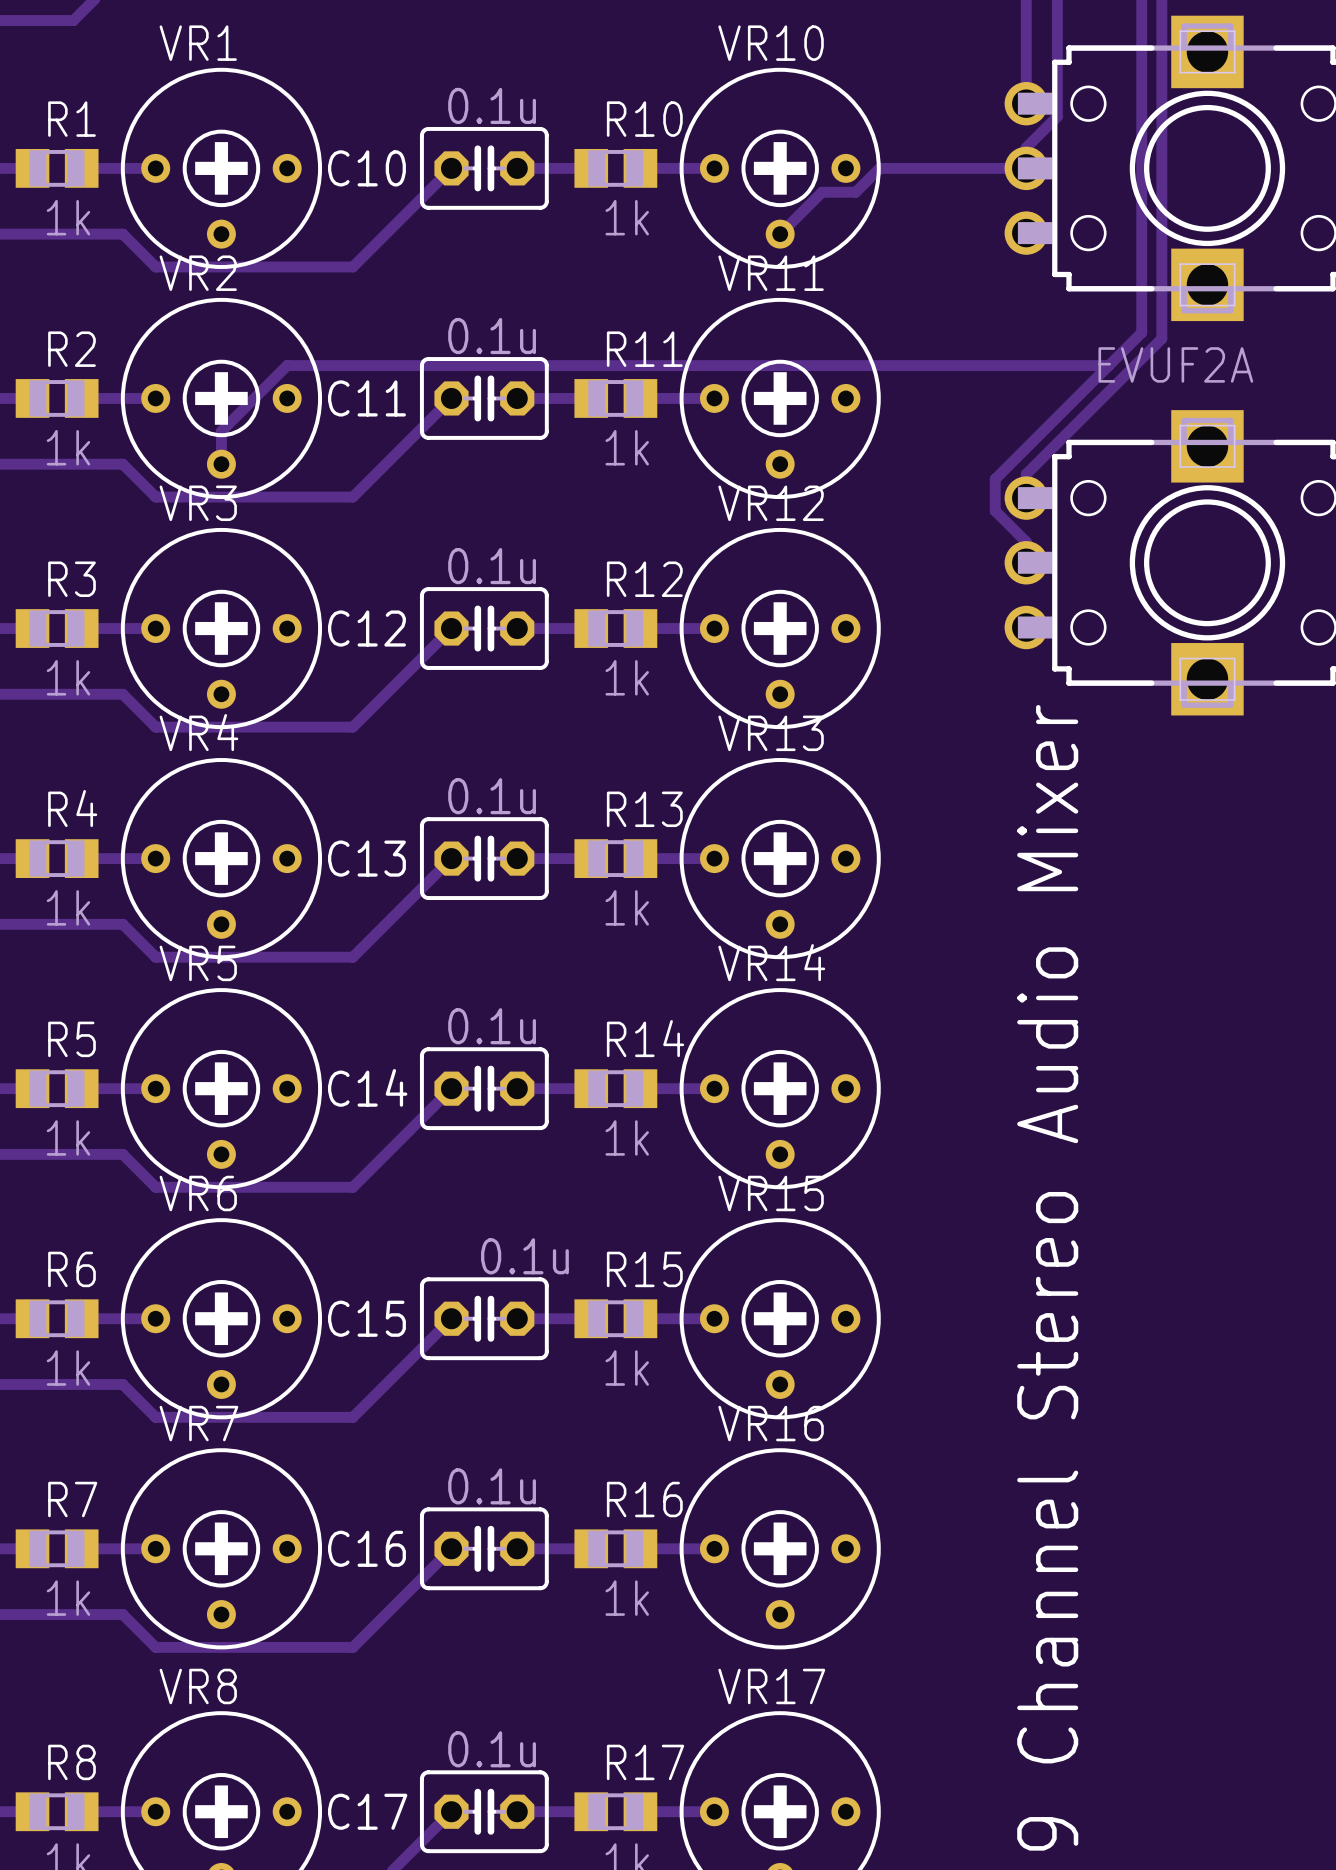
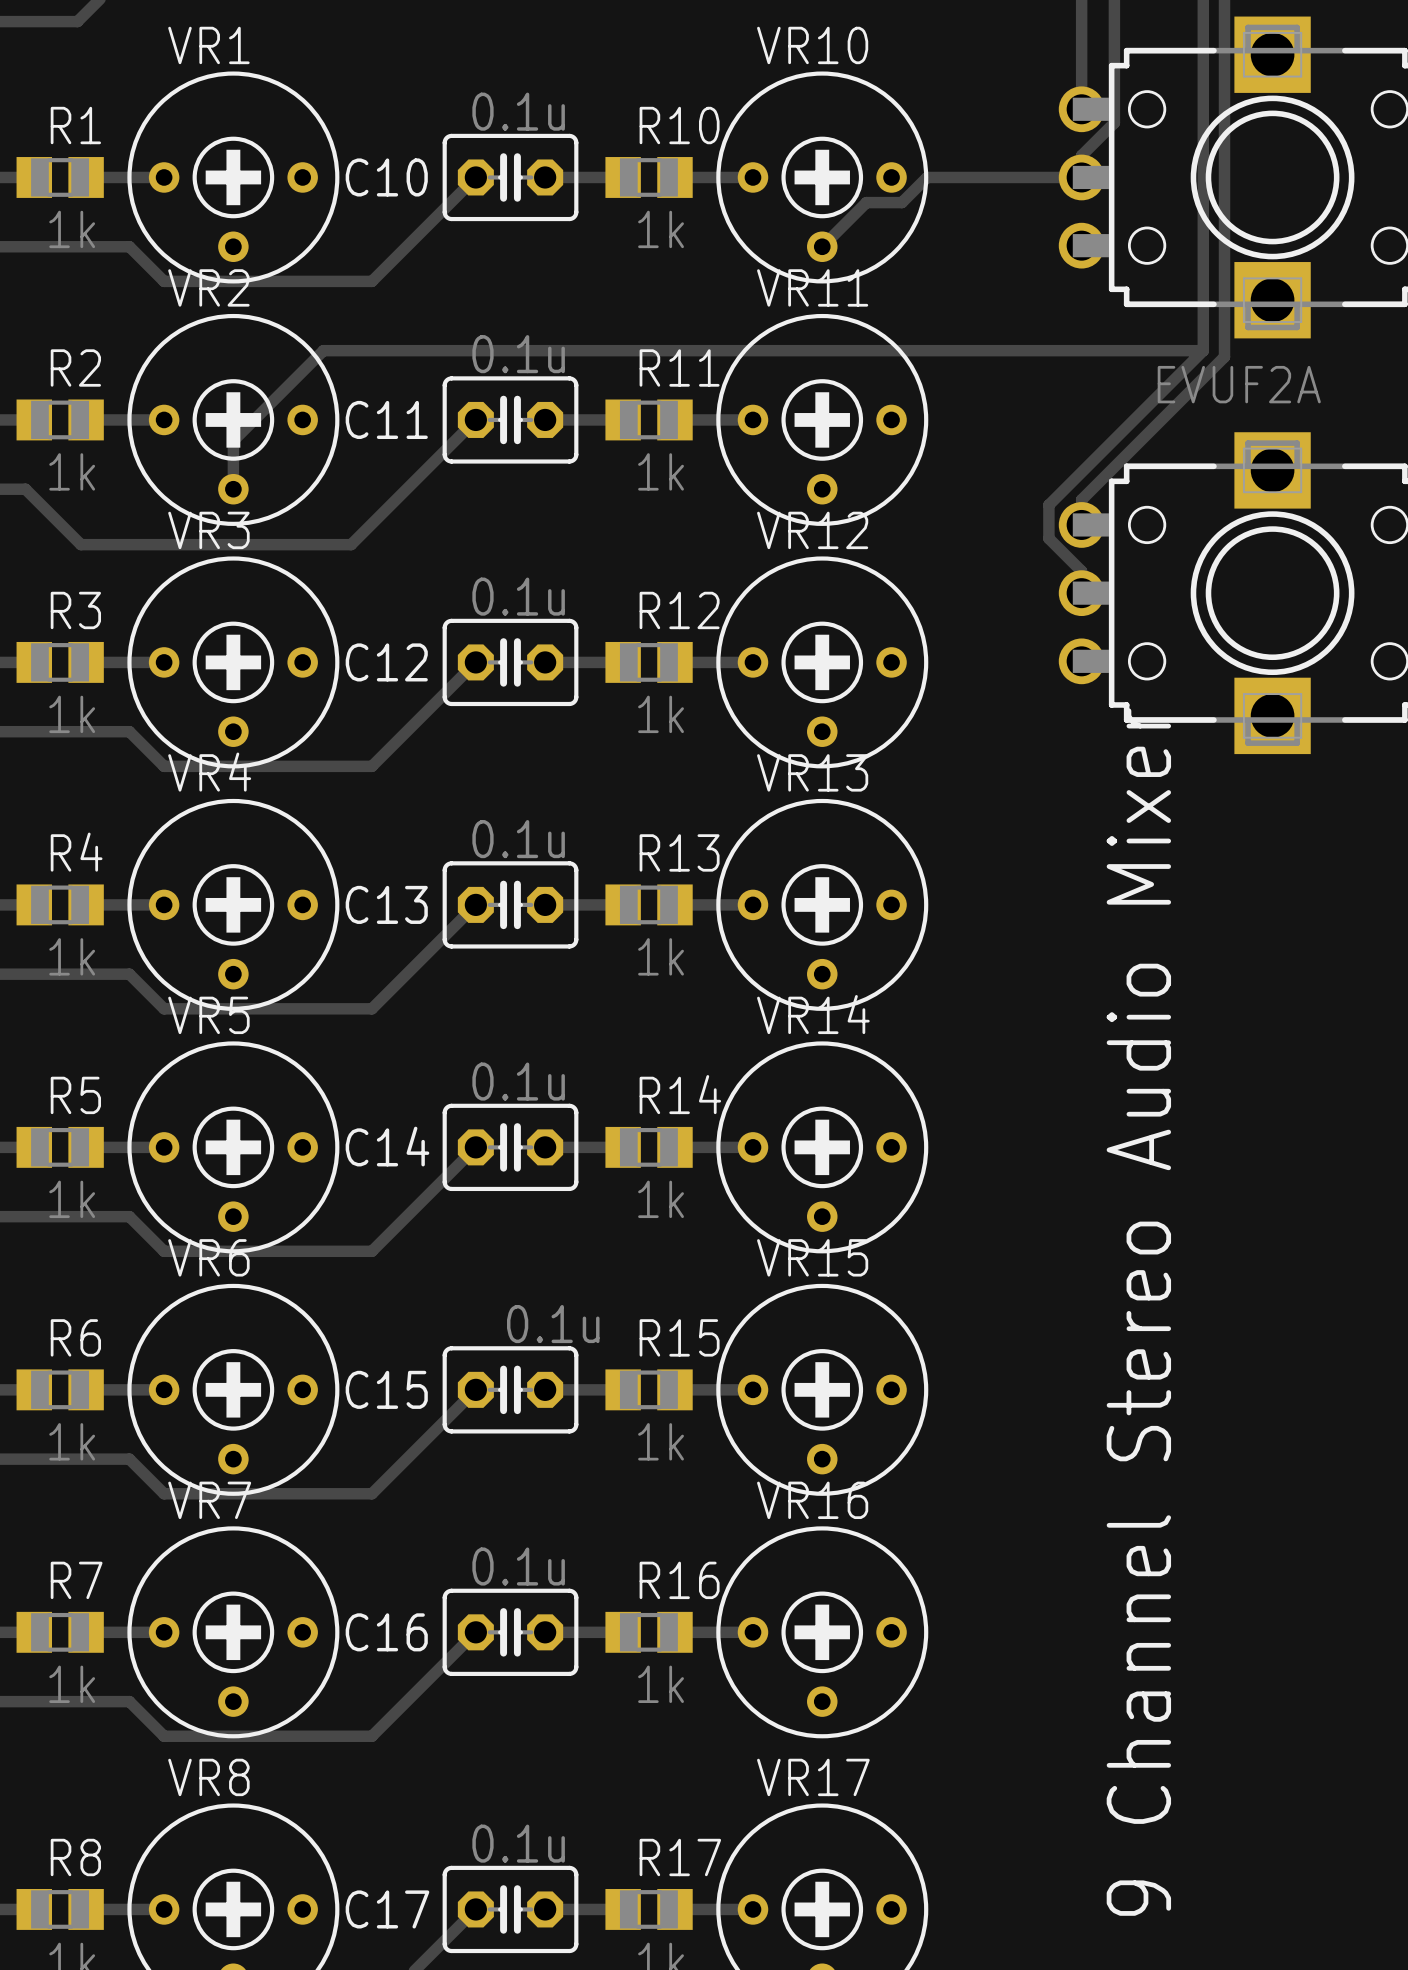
track: (1108, 365) (287, 365) (221, 431) -> (1203, 350) (323, 350) (233, 440) (233, 454)
track: (24, 464) (122, 464) (155, 497) (352, 497) -> (25, 489) (80, 544) (351, 544) (371, 523)
text position: 9 Channel Stereo Audio Mixer (1047, 1277) -> 9 Channel Stereo Audio Mixer (1138, 1312)

